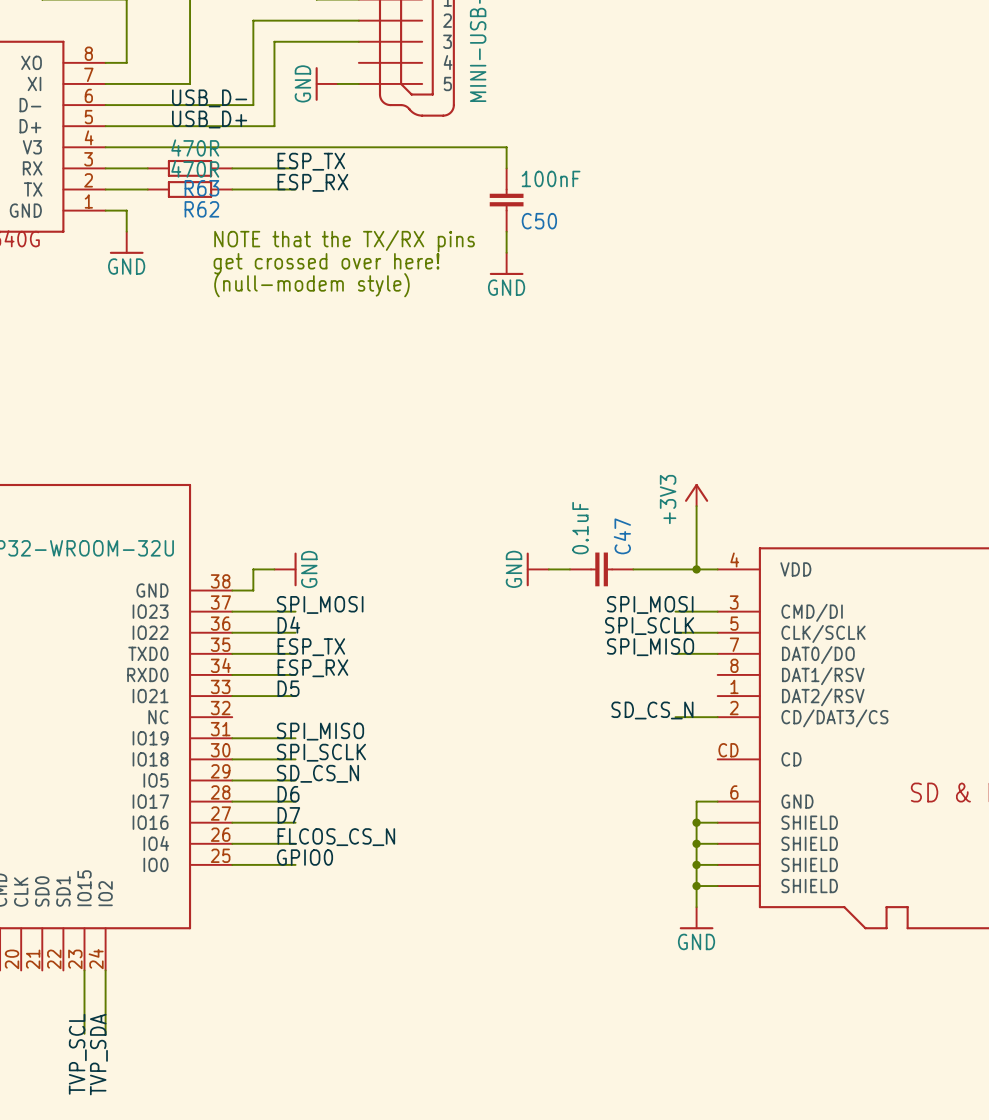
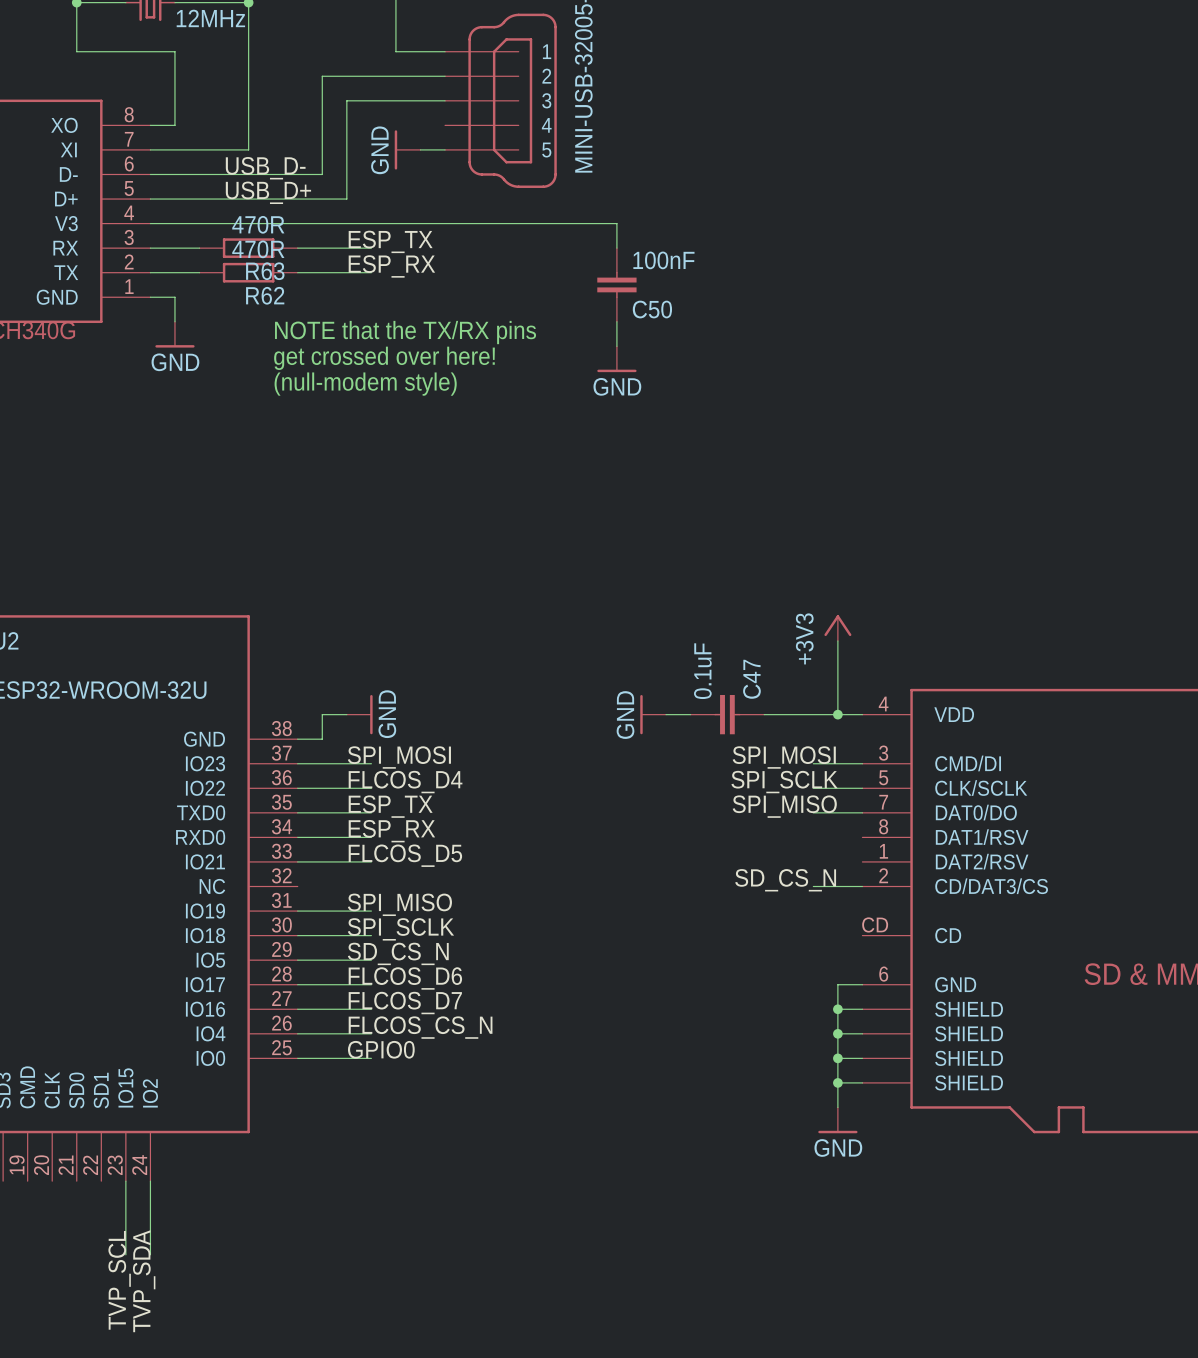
label: D4 (288, 625) -> FLCOS_D4 (405, 782)
label: D5 (288, 688) -> FLCOS_D5 (405, 855)
label: D6 (288, 794) -> FLCOS_D6 (405, 978)
label: D7 (288, 815) -> FLCOS_D7 (405, 1003)

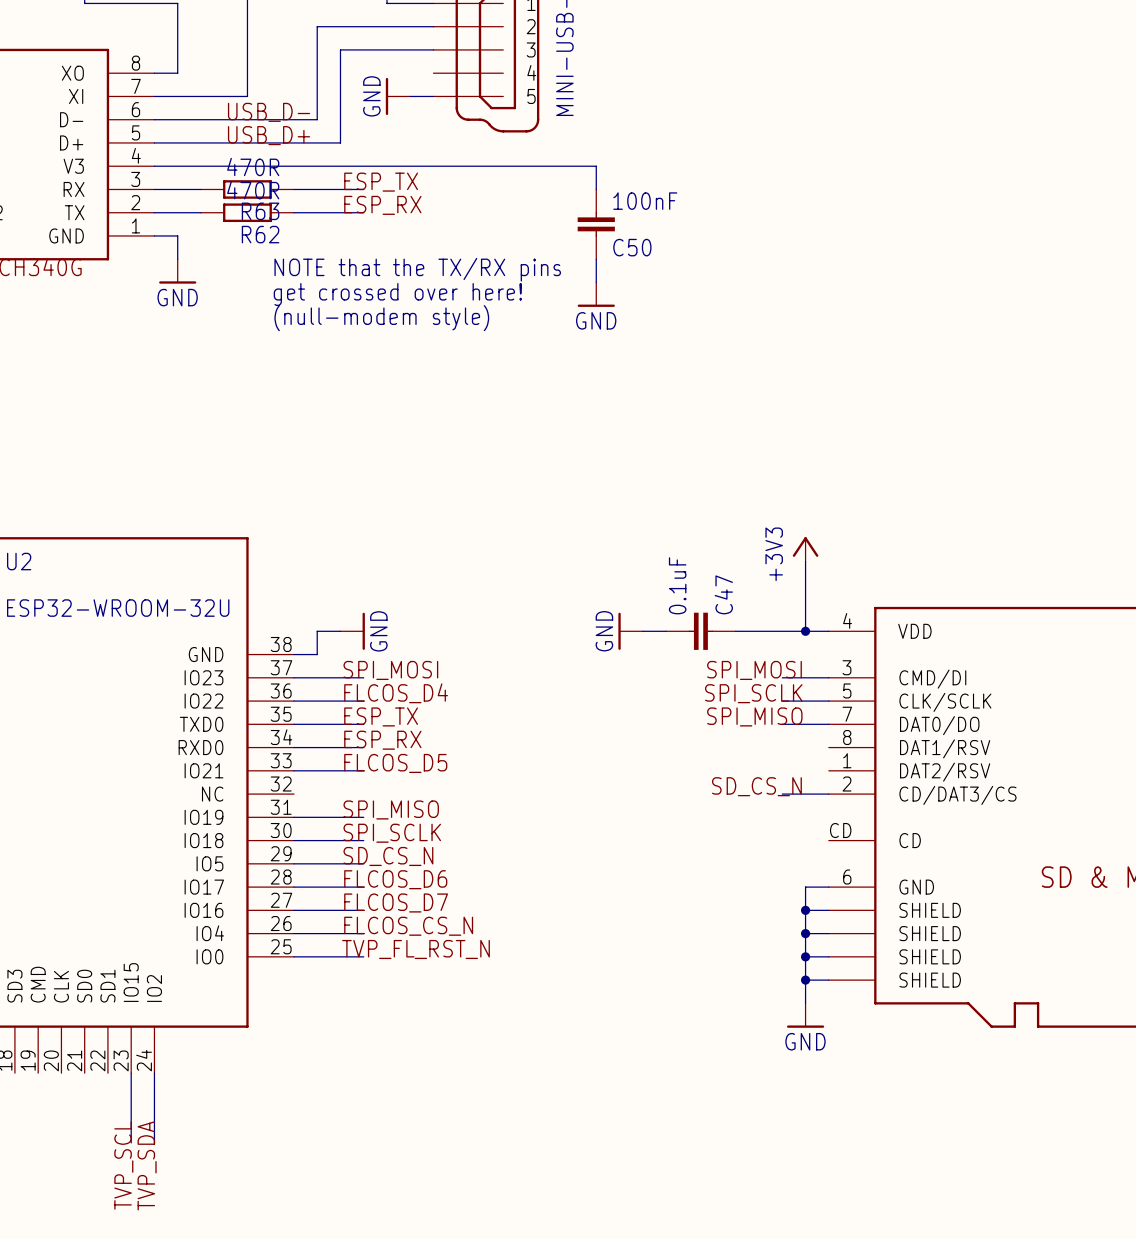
label: GPIO0 (381, 1049) -> TVP_FL_RST_N (415, 949)

